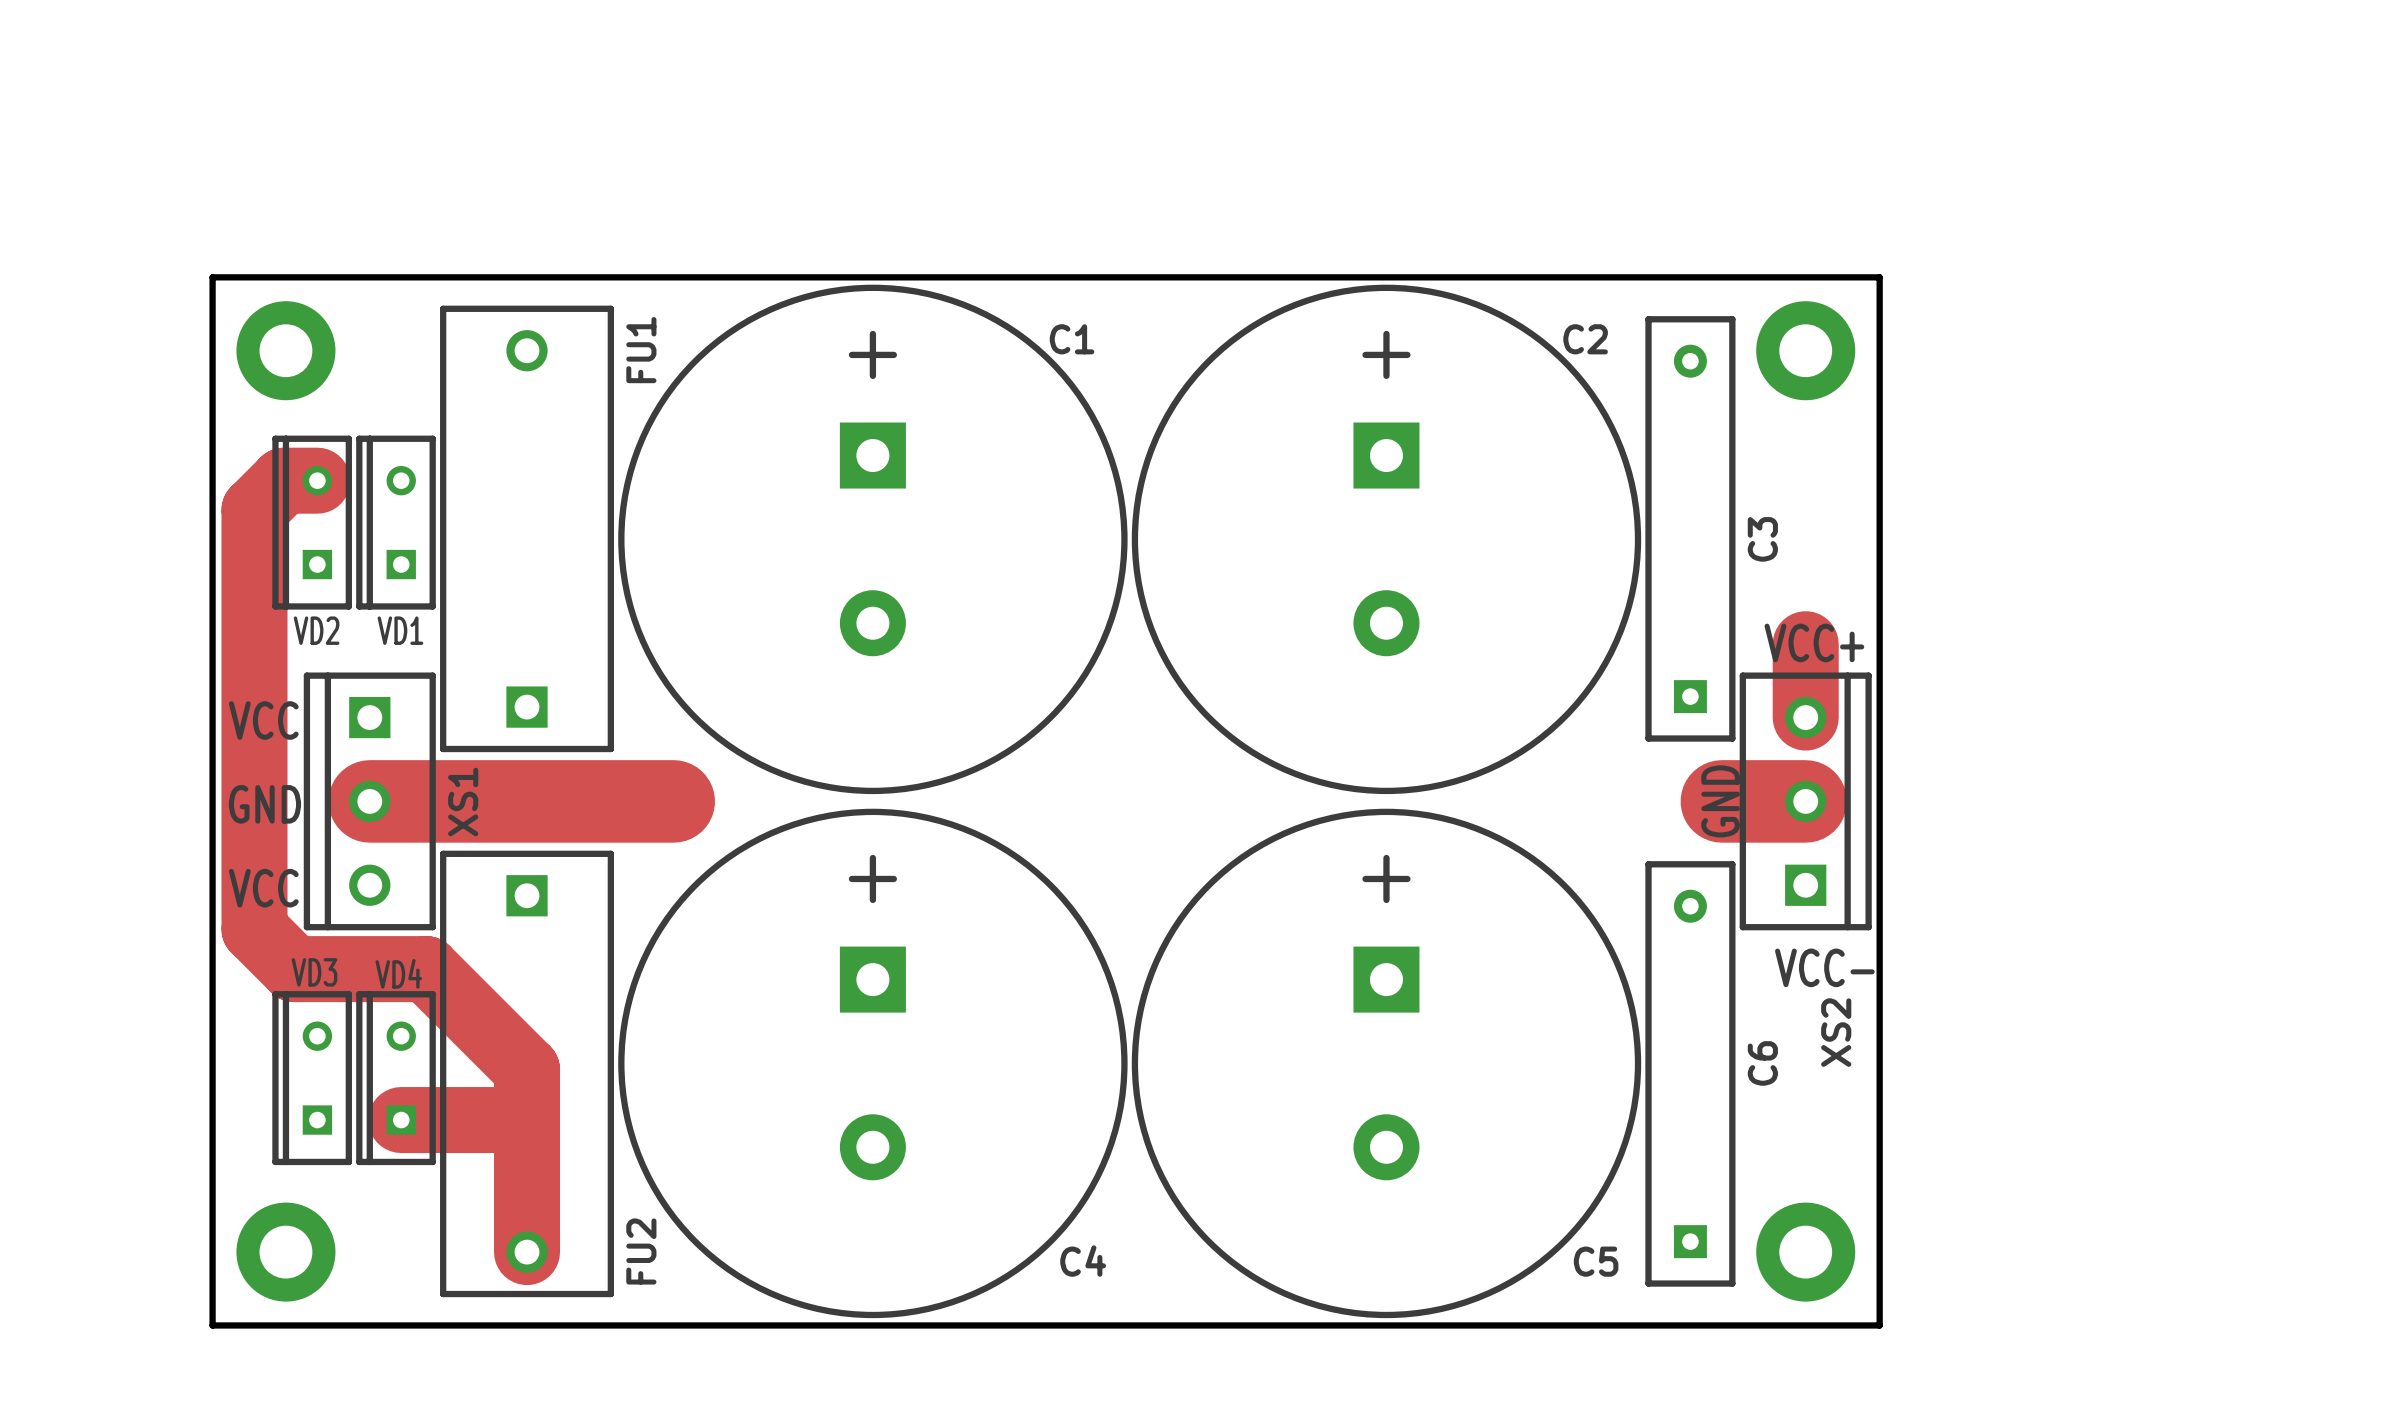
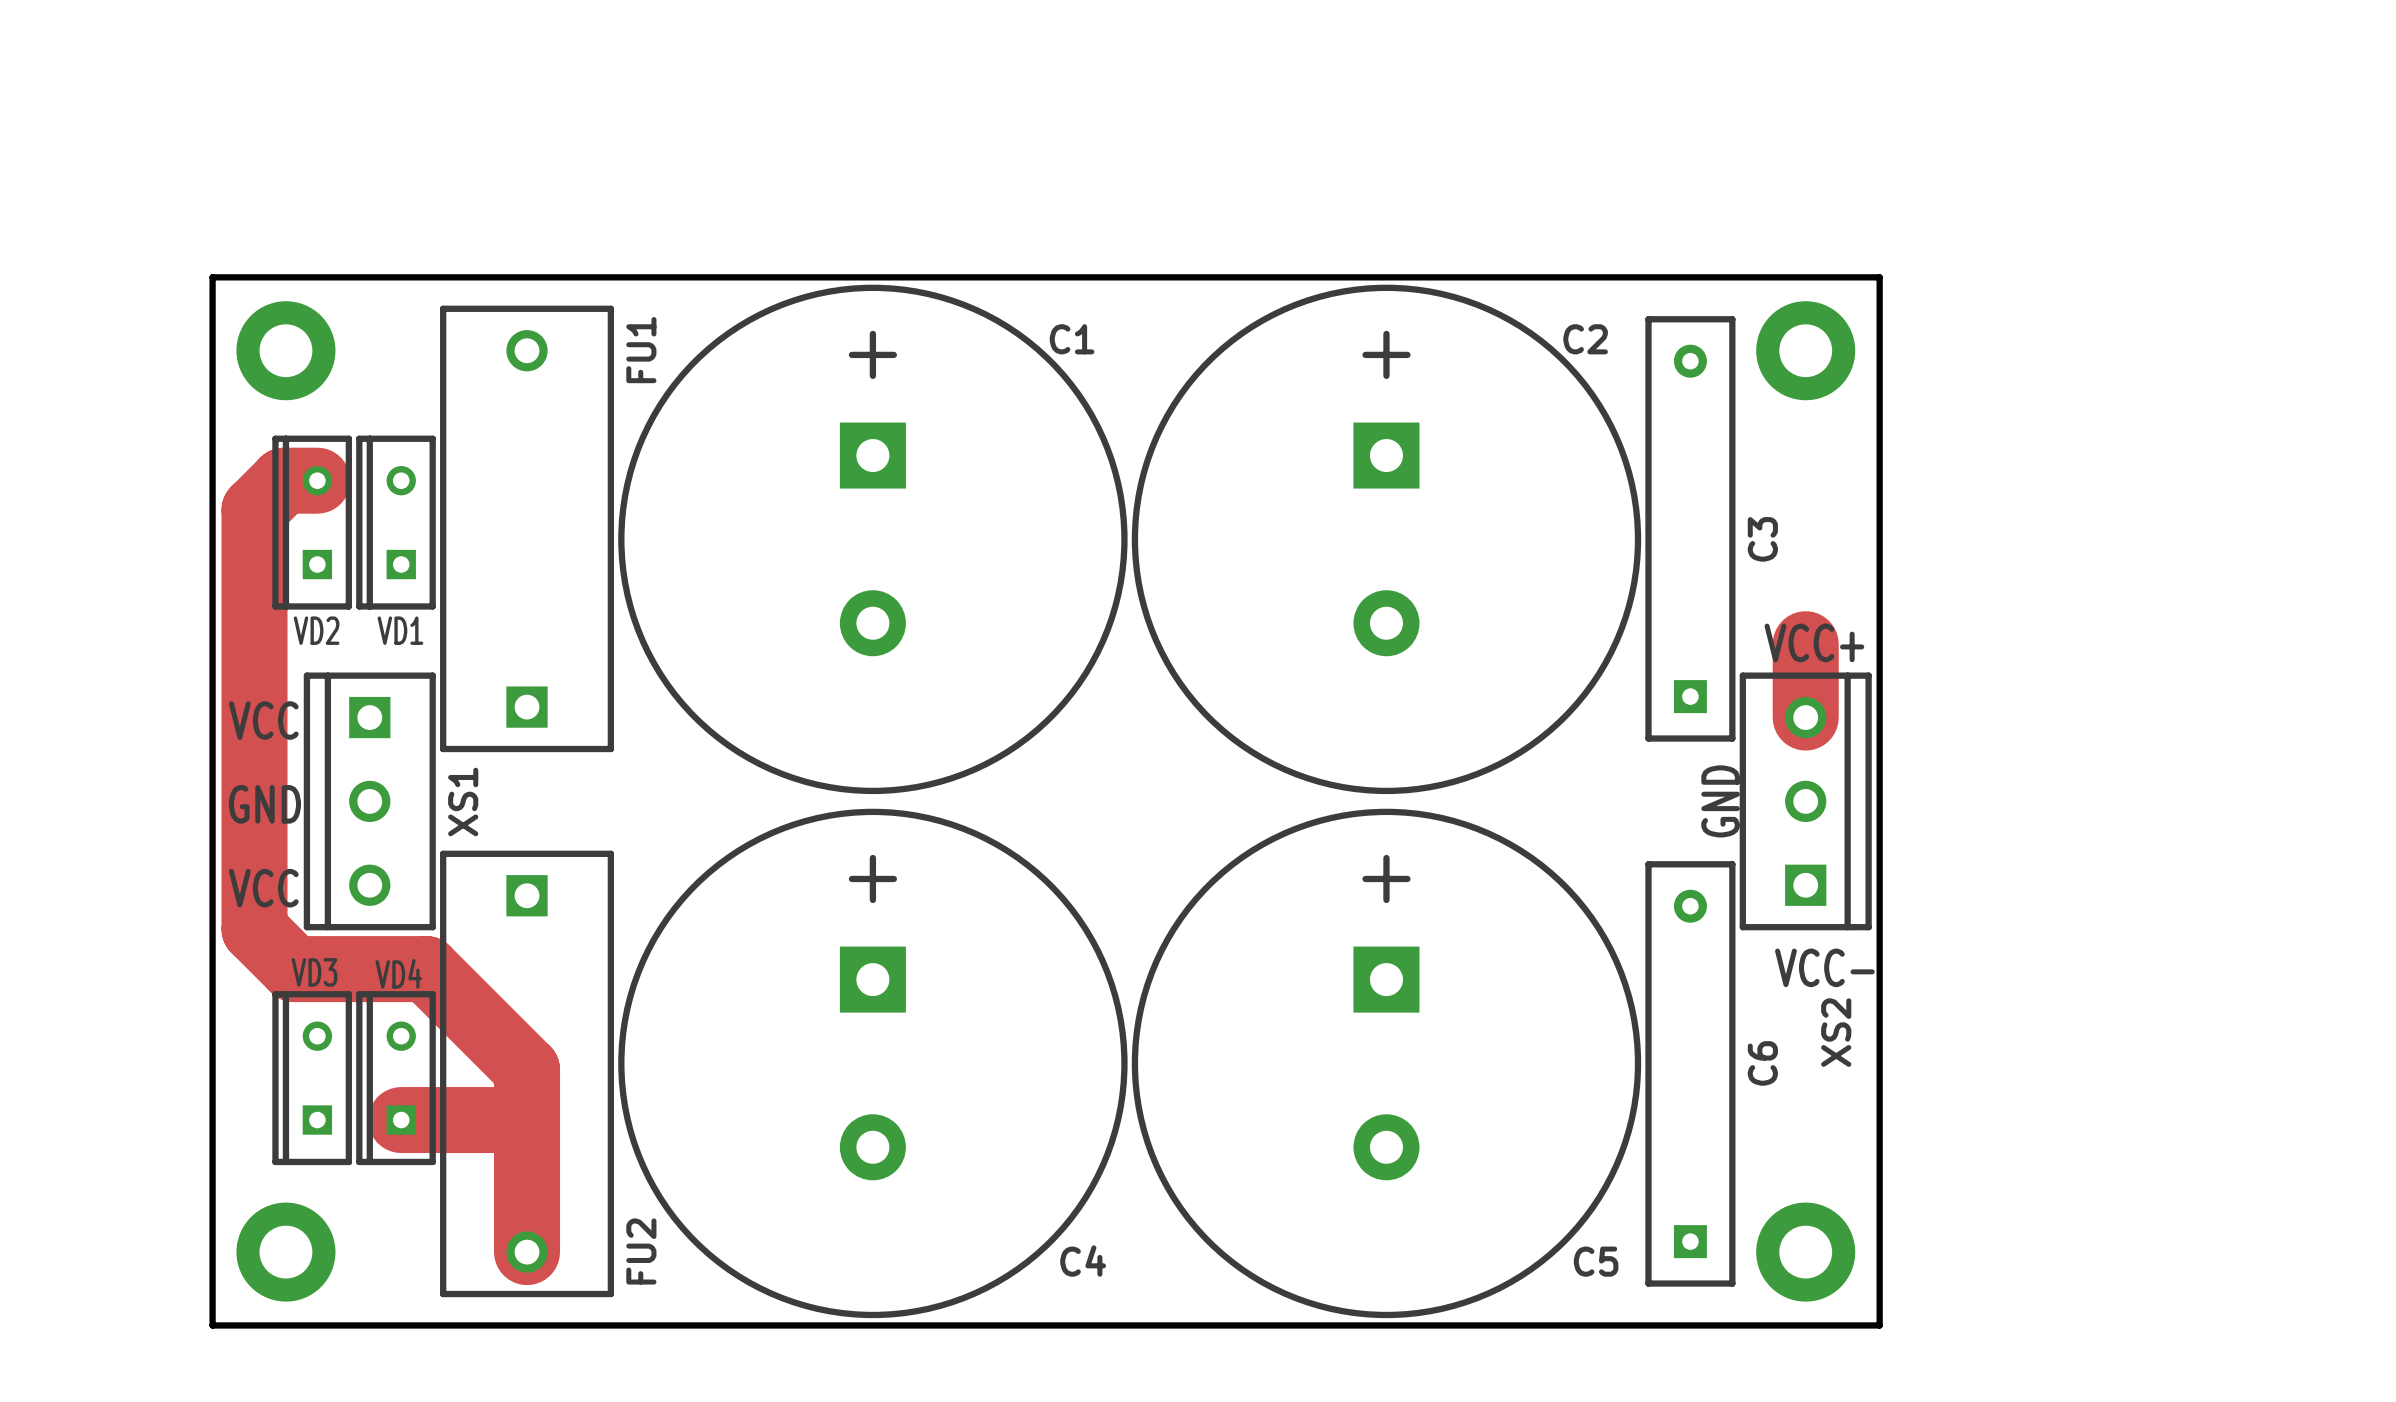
track: (369, 801) (673, 801) -> none
track: (1721, 801) (1805, 801) -> none

